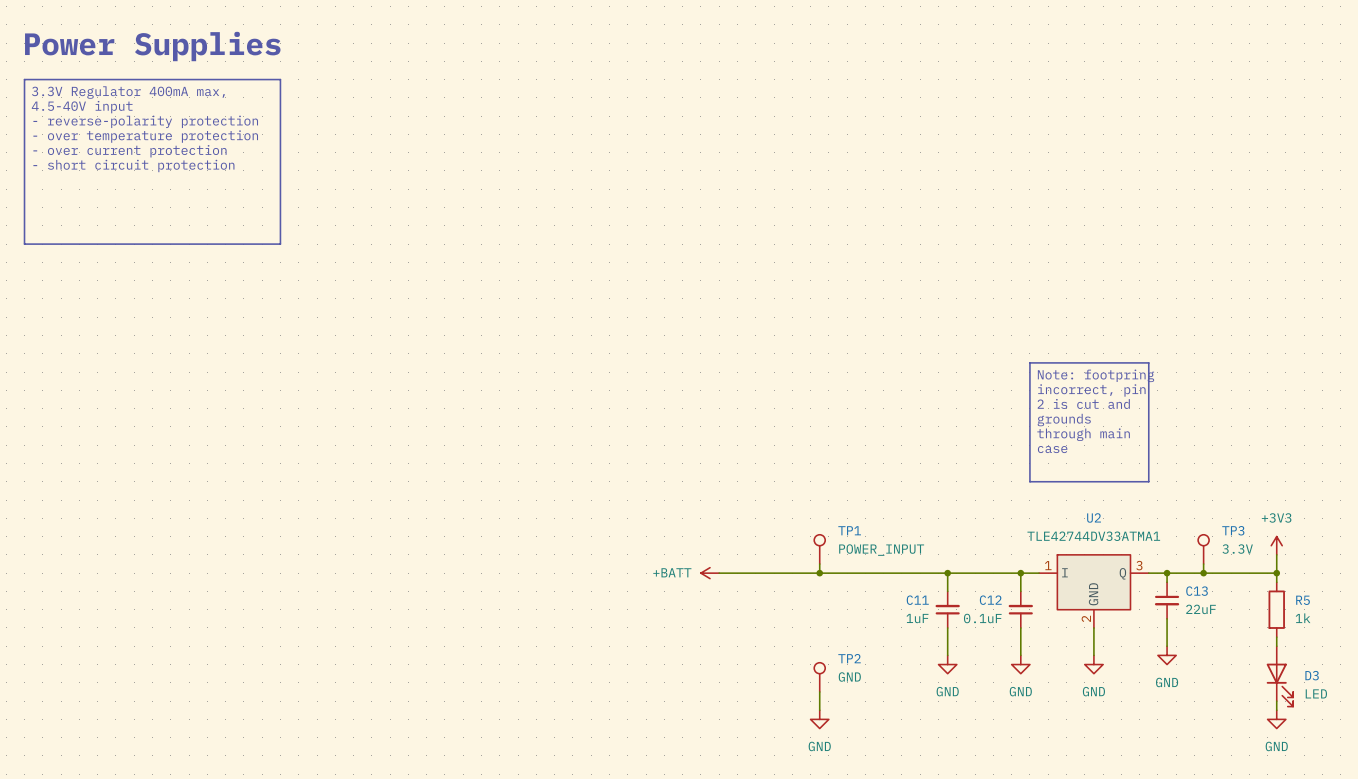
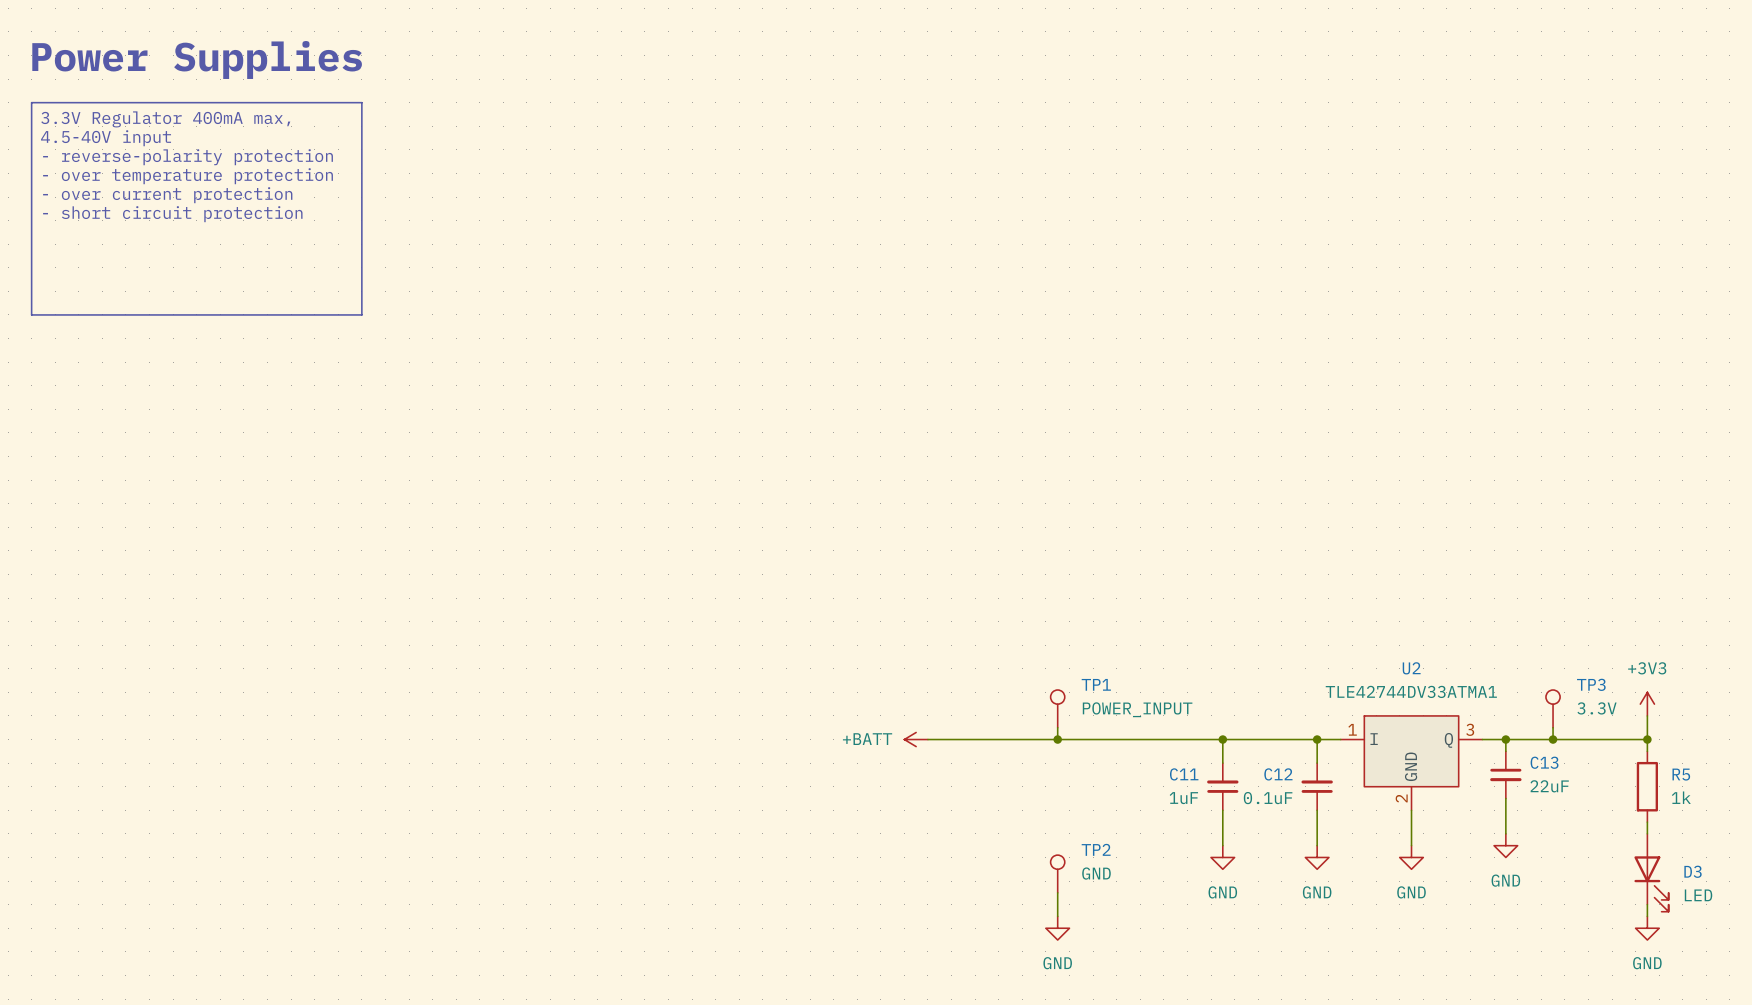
line: (1029, 362) (1148, 362) (1148, 481) (1029, 481) (1029, 362) -> none
text: Note: footpring (1096, 375) -> none
text: incorrect, pin (1091, 390) -> none
text: 2 is cut and (1083, 403) -> none
text: grounds (1064, 420) -> none
text: through main (1083, 434) -> none
text: case (1052, 449) -> none

